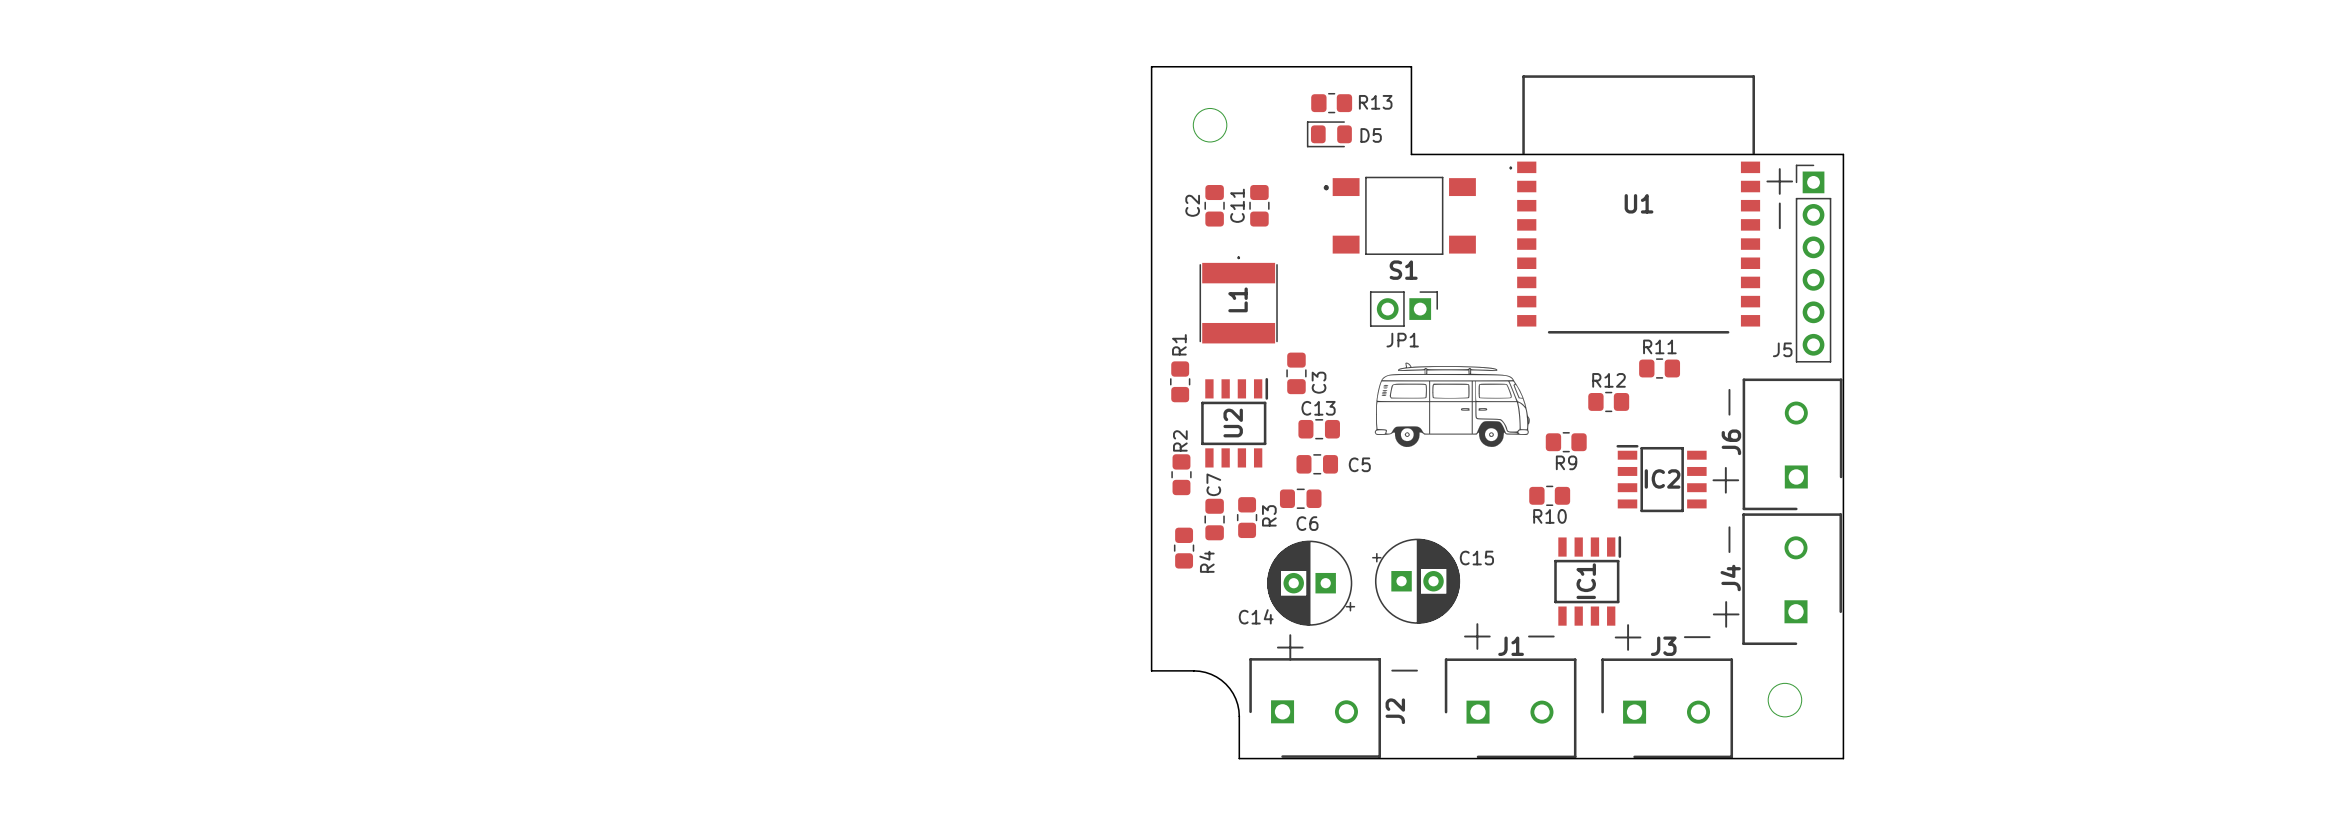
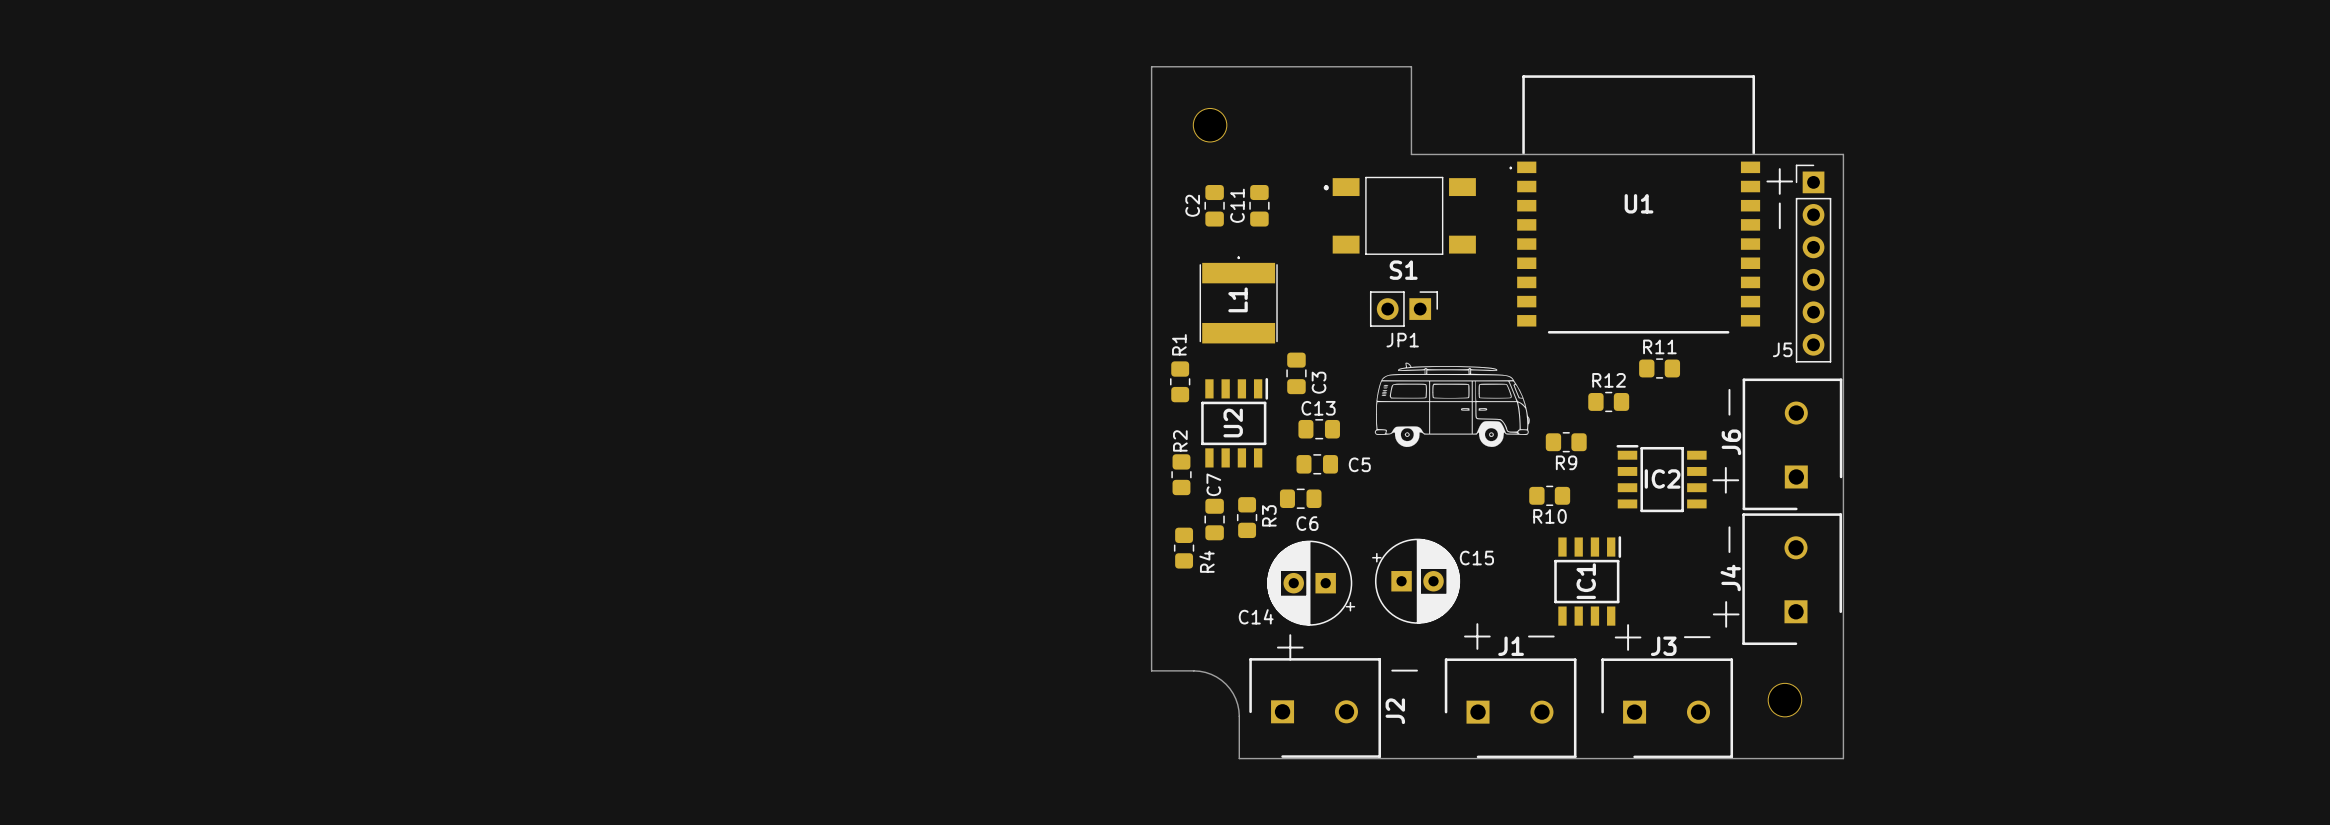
R13: (1331, 103) -> none
D5: (1329, 134) -> none

